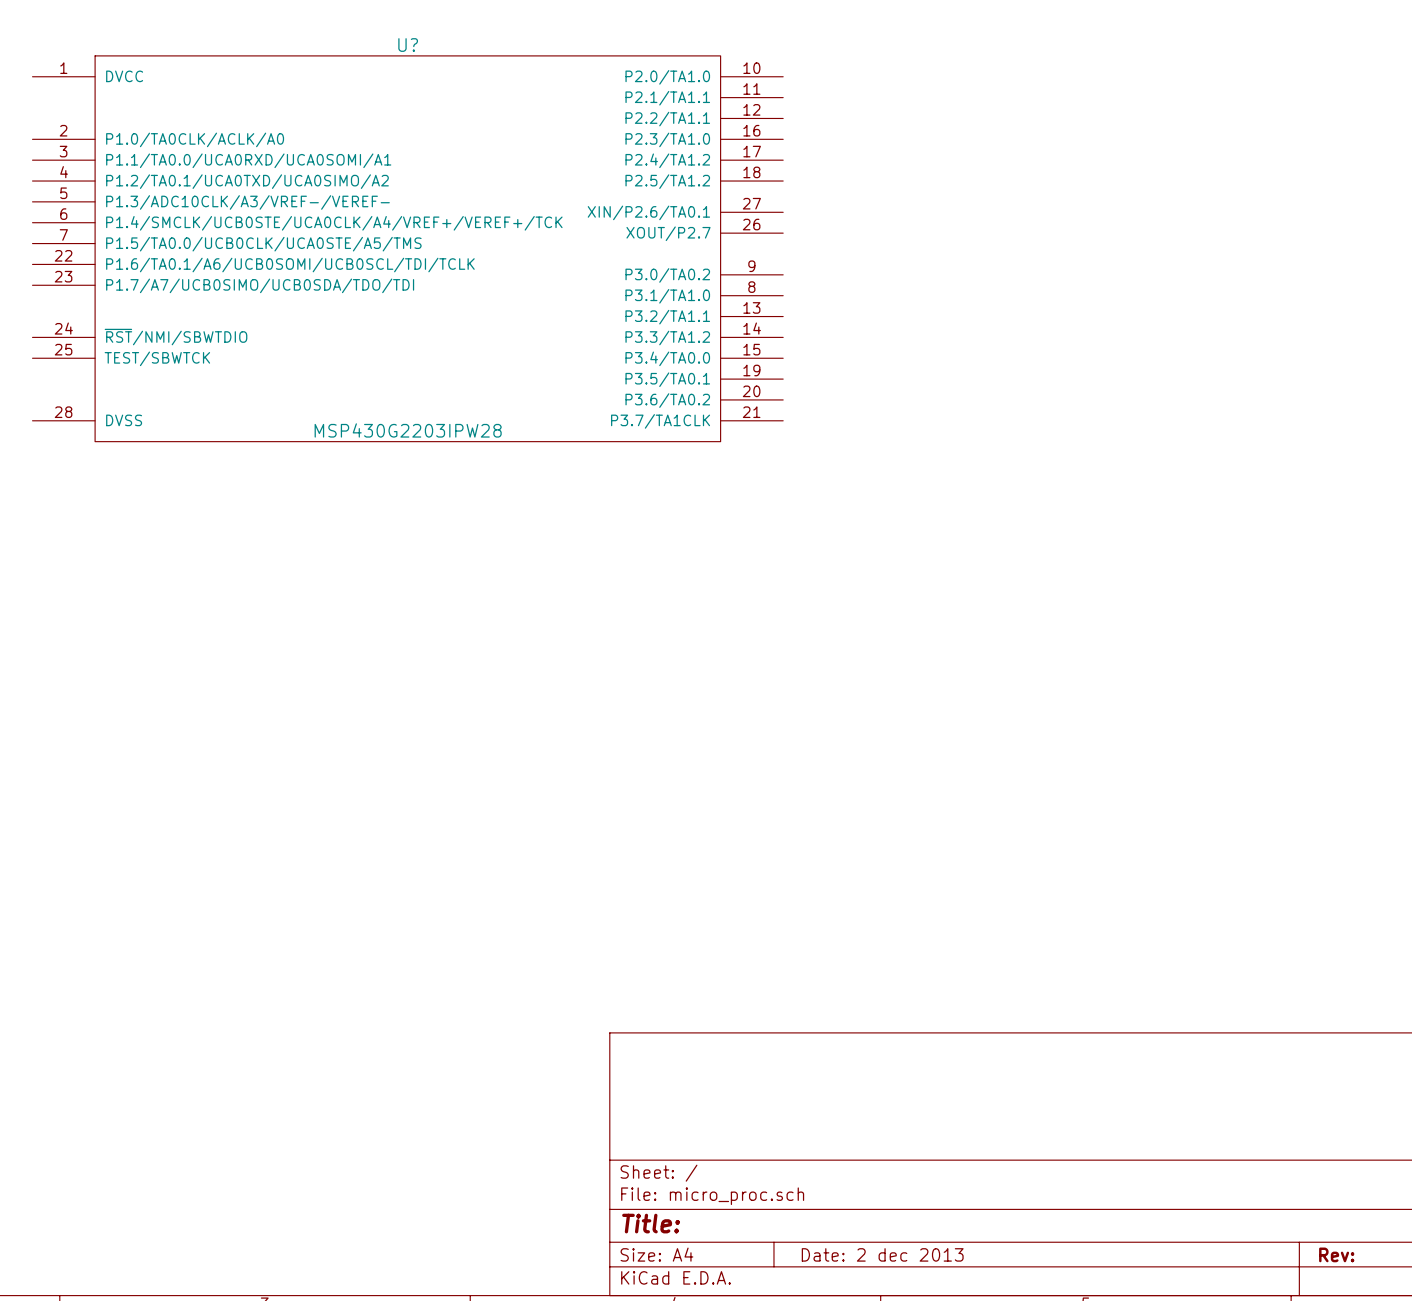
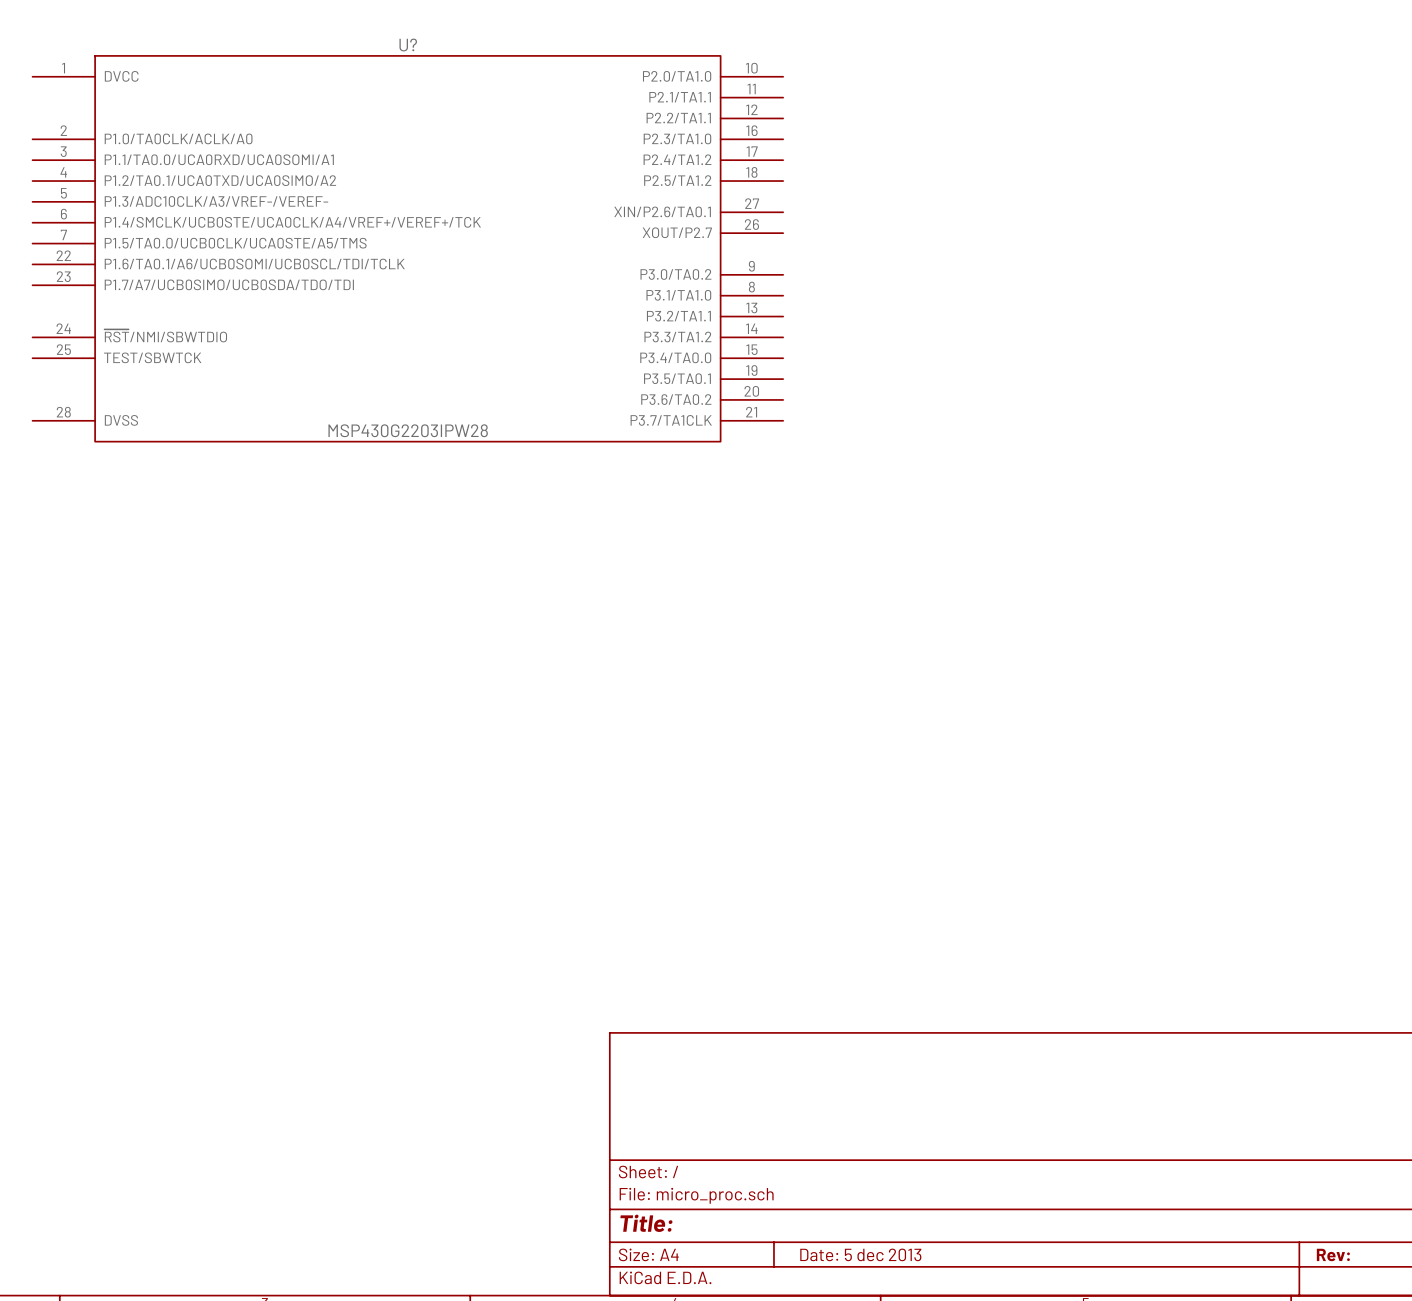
title block: Date: 2 dec 2013 (882, 1254) -> Date: 5 dec 2013 (860, 1254)

